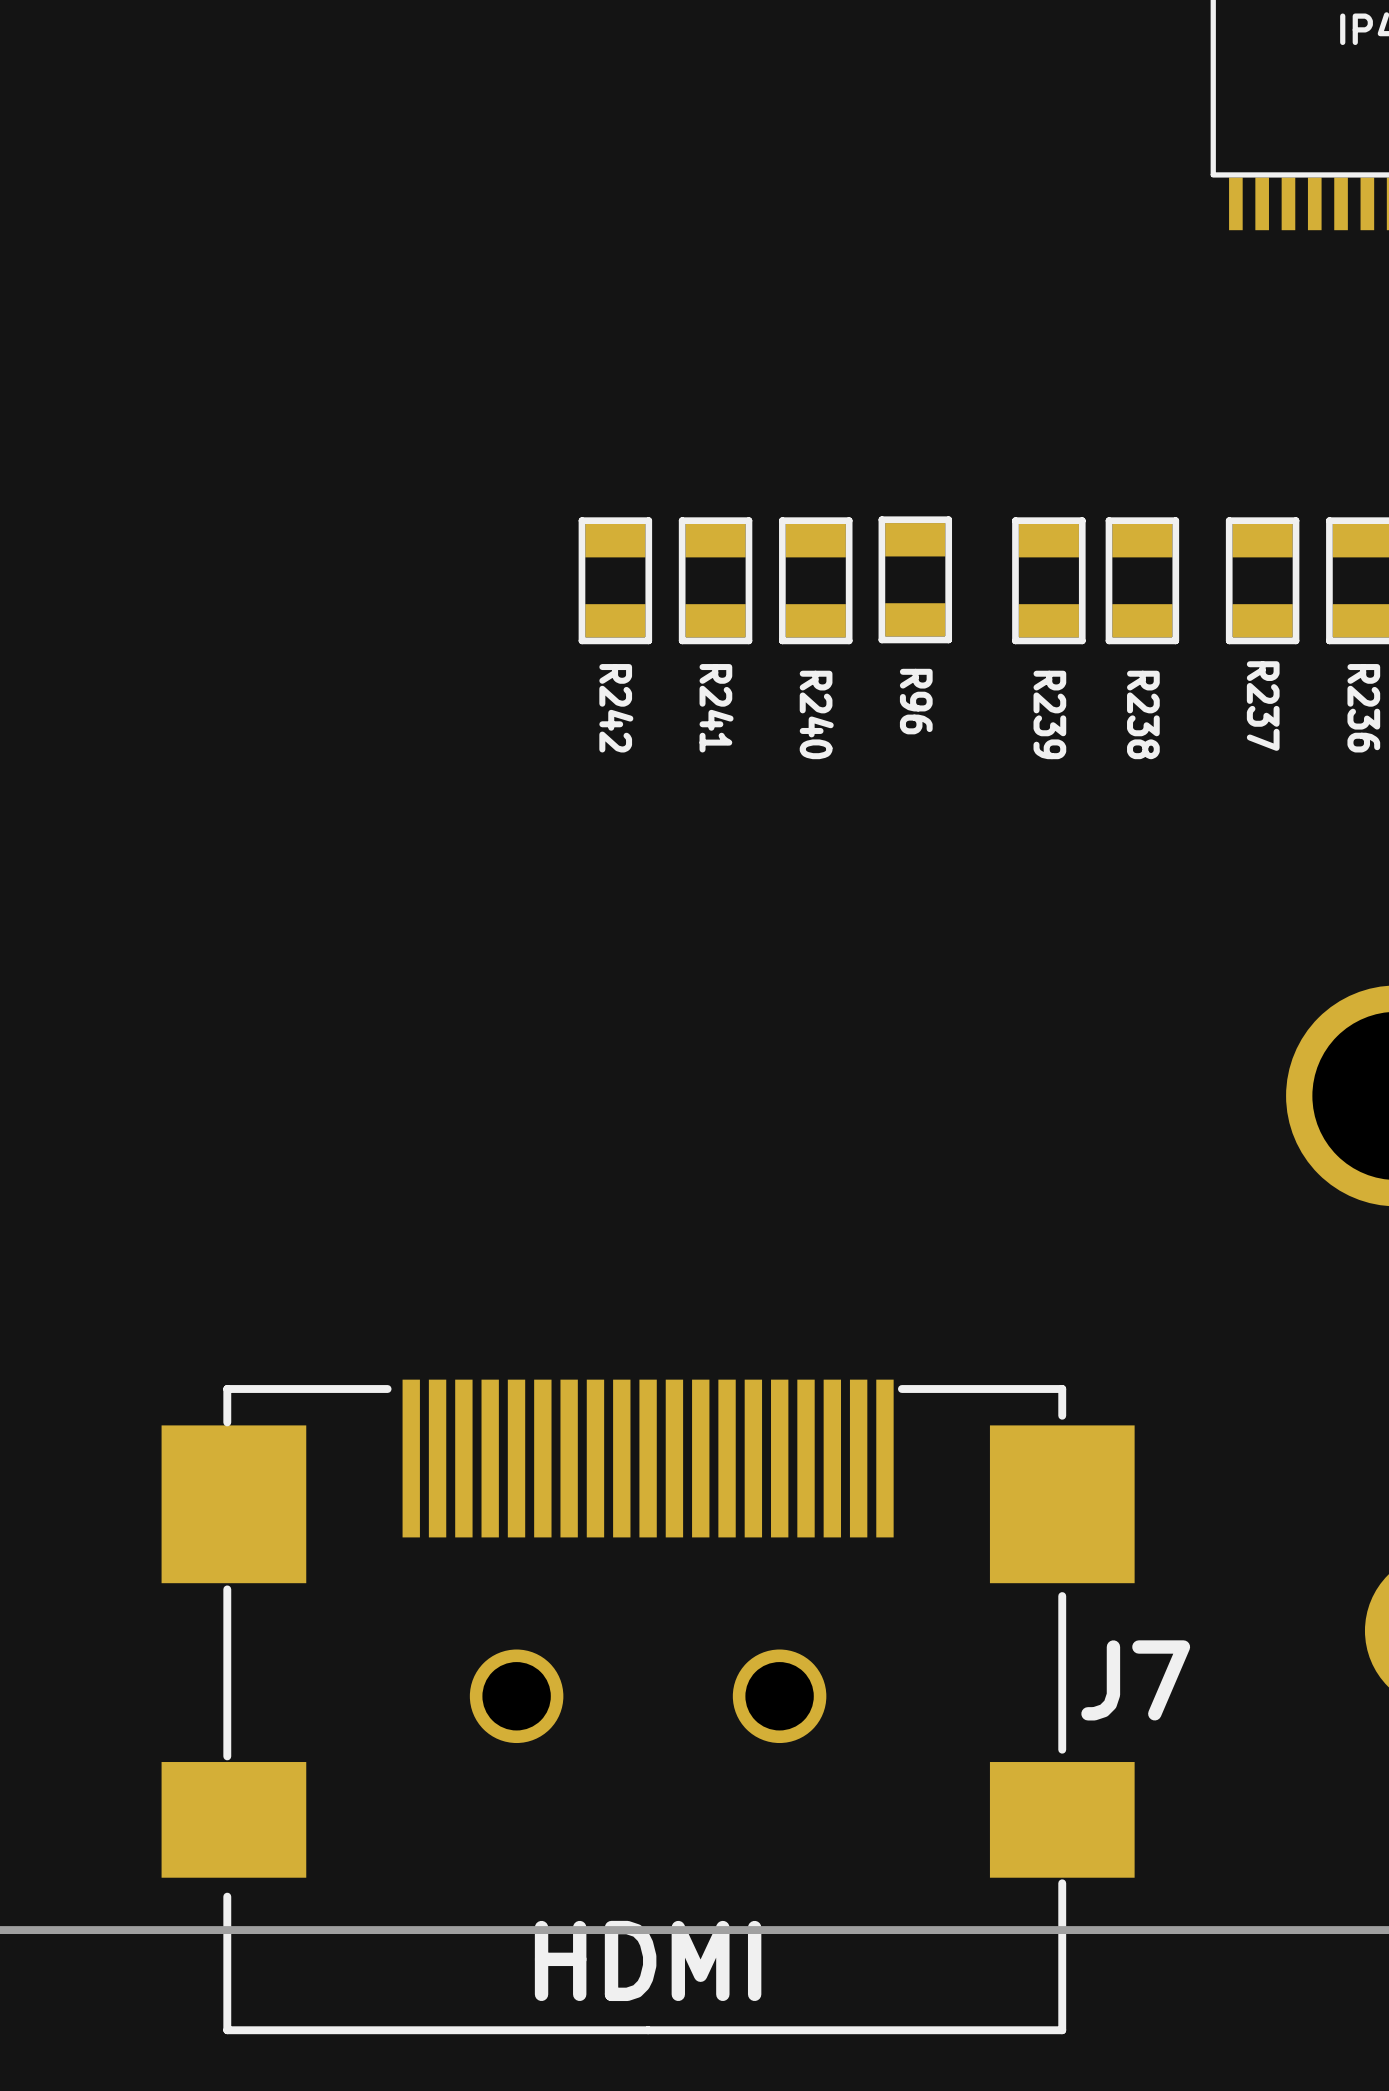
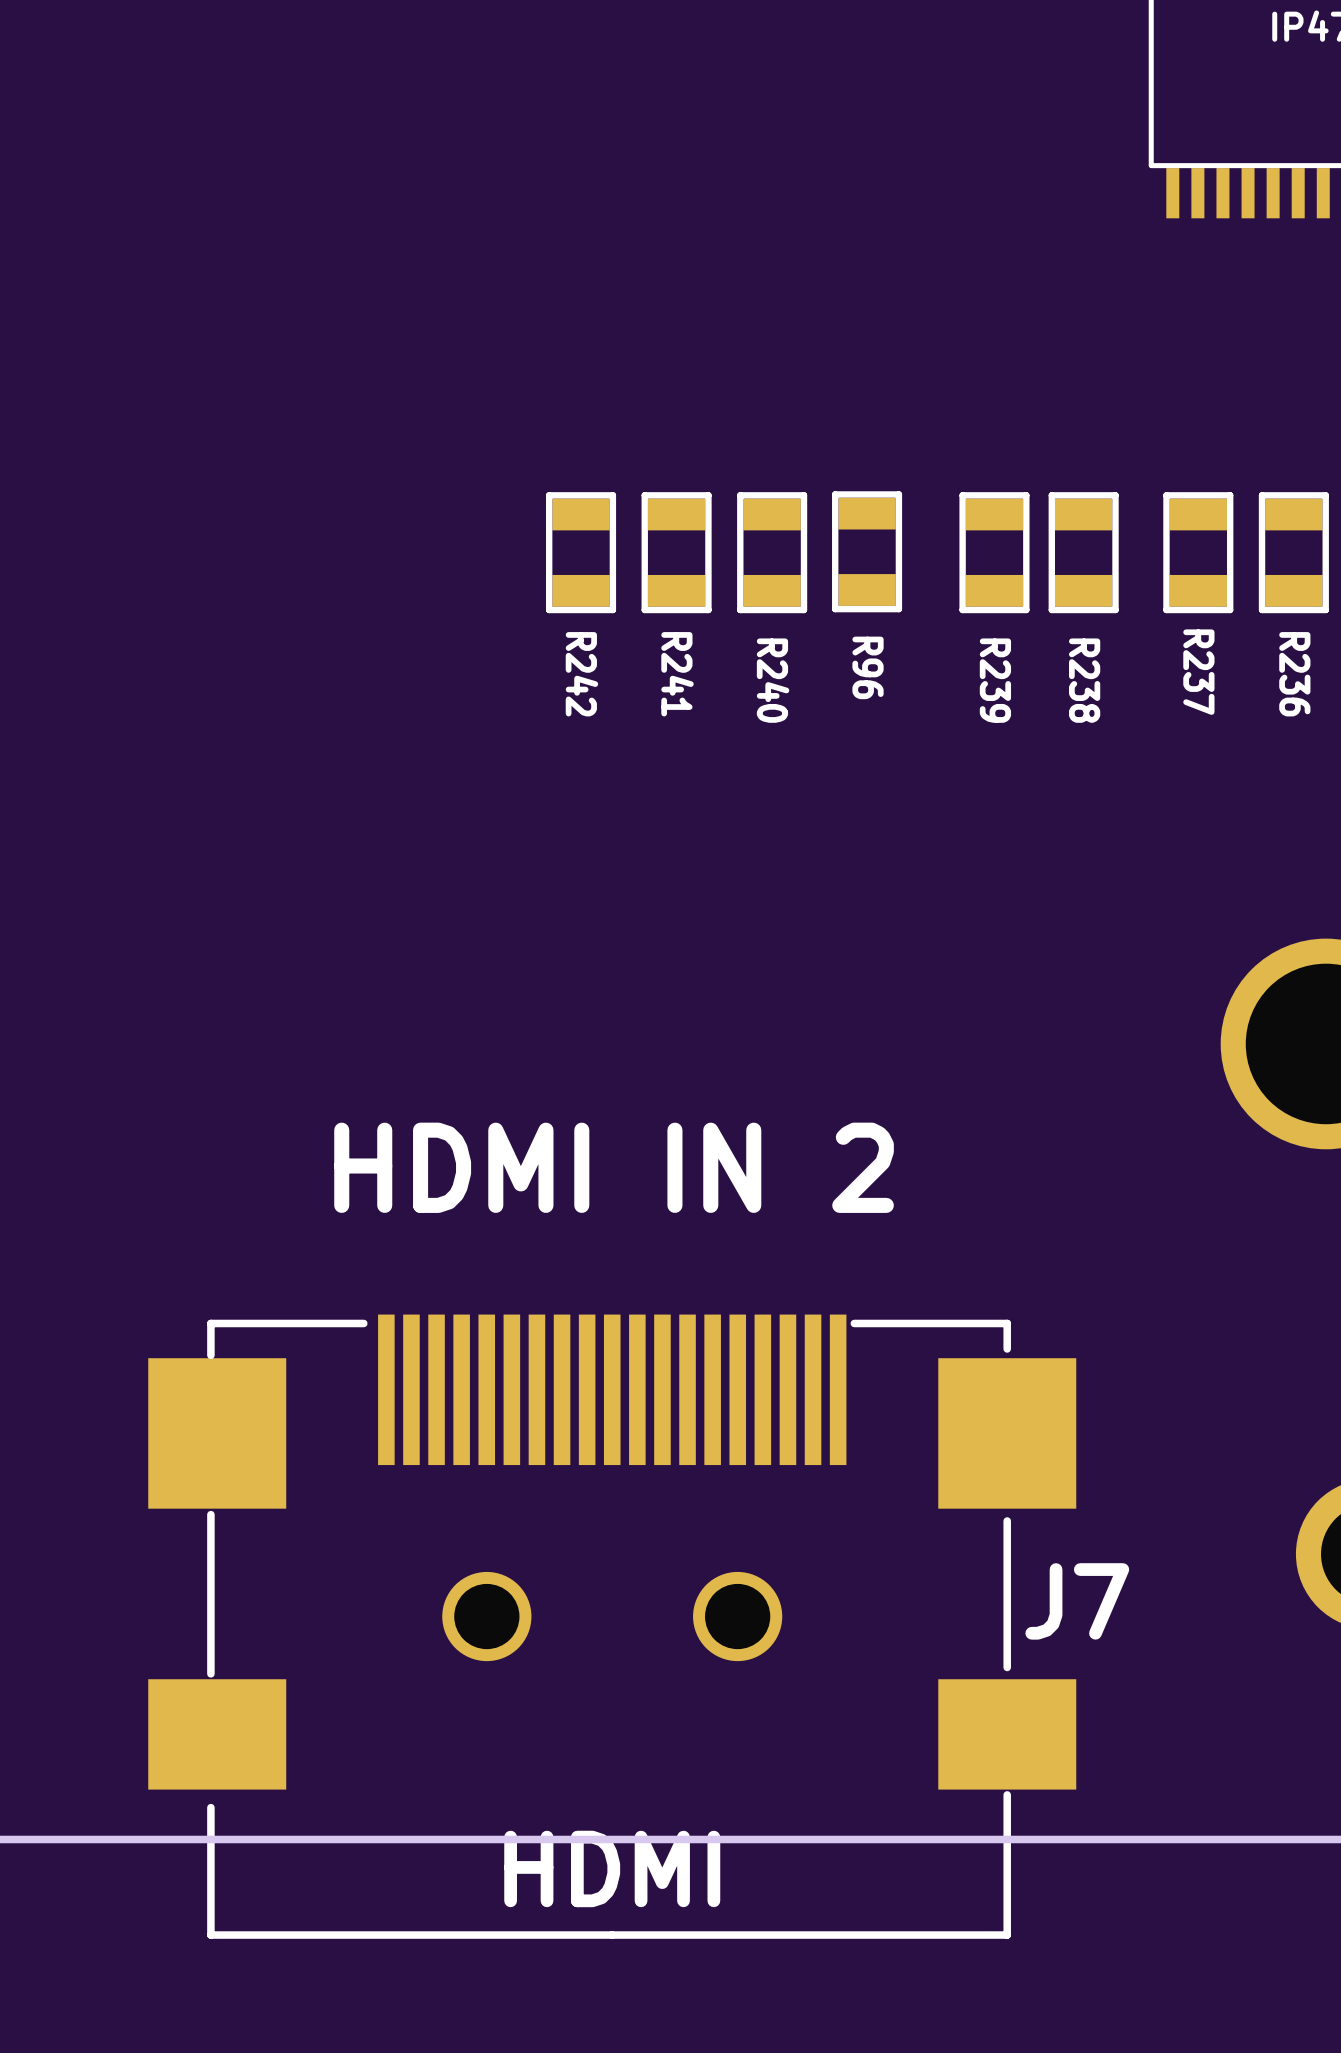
text: none -> HDMI IN 2 (614, 1167)

